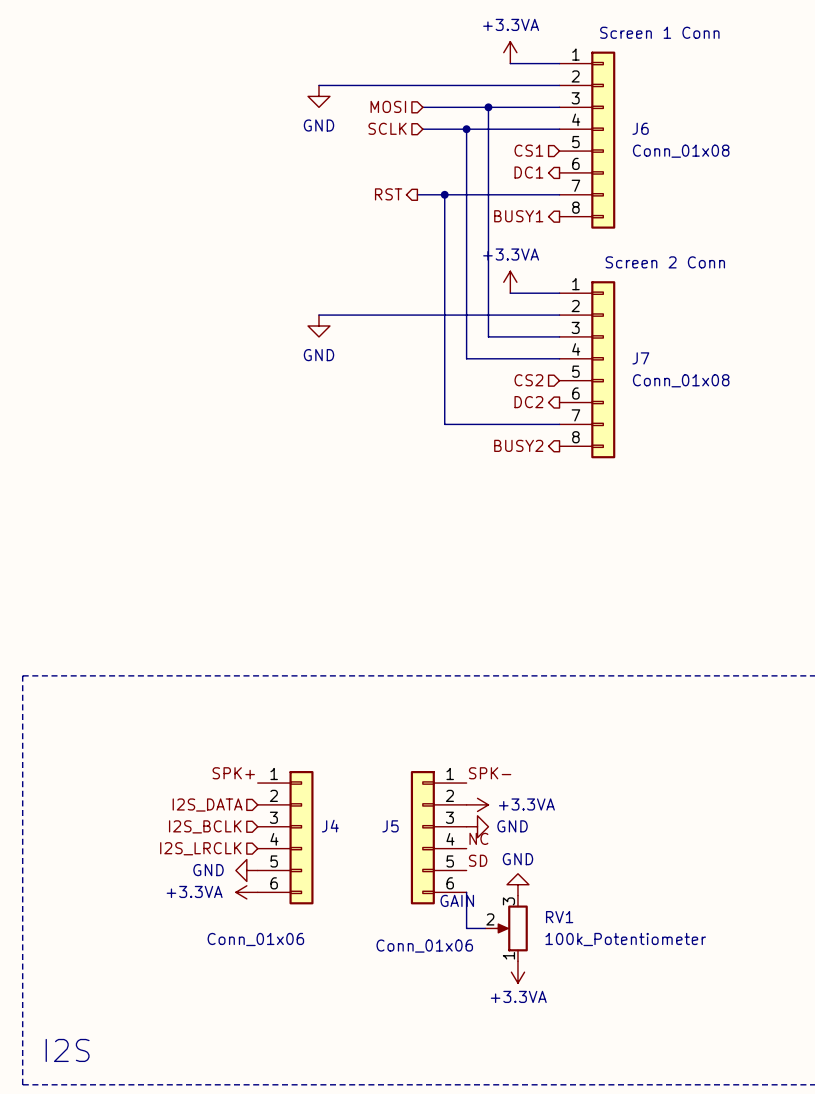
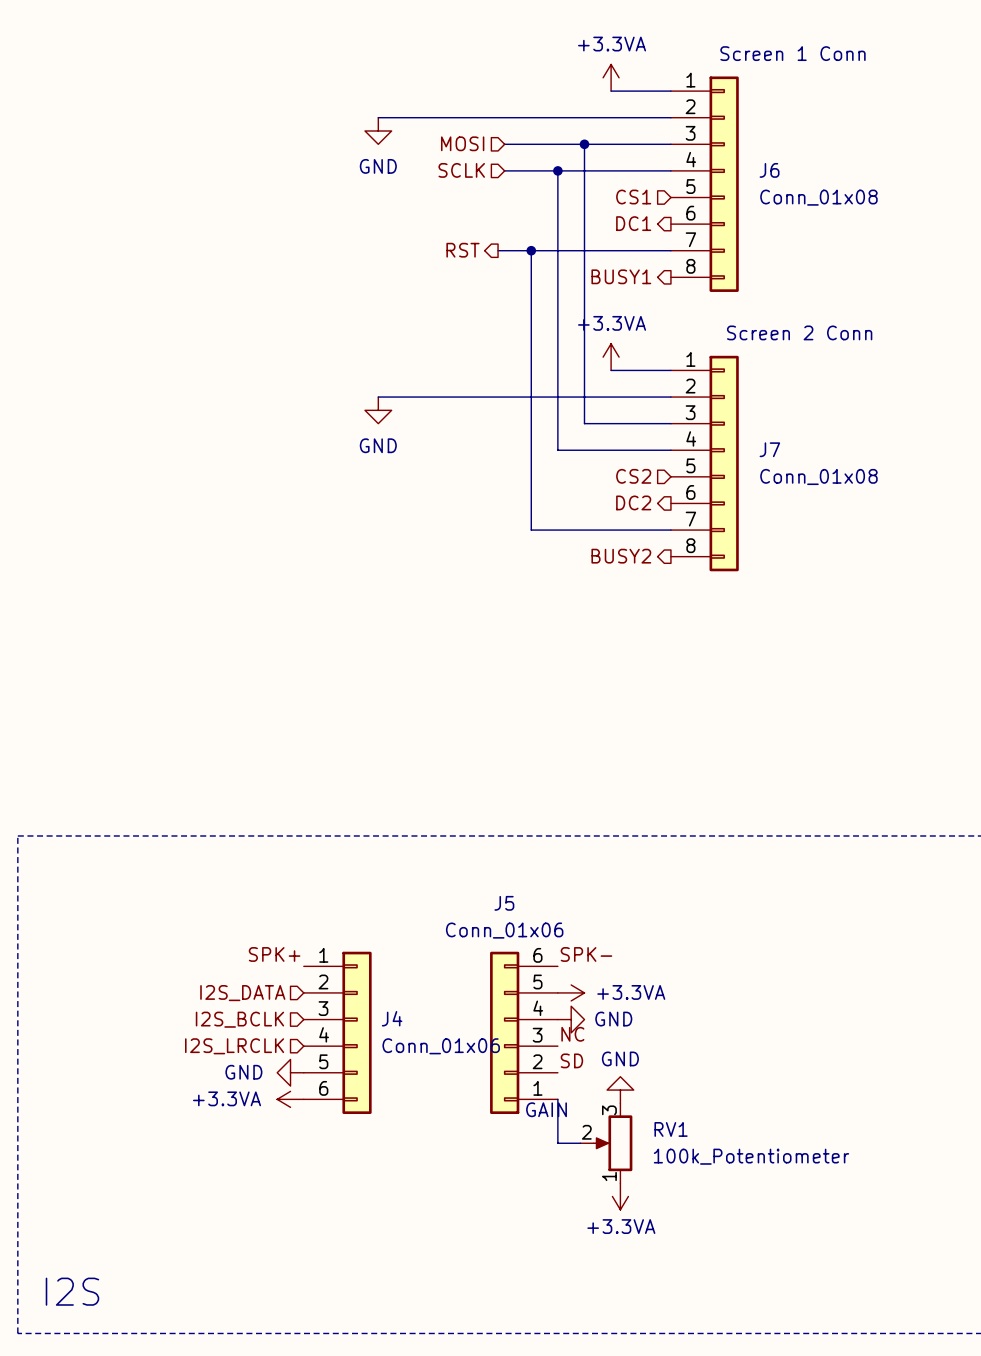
J5 name position: J5 (390, 826) -> J5 (504, 903)
J5 flip: as is (422, 837) -> up-down (504, 1032)
J4 value position: Conn_01x06 (255, 939) -> Conn_01x06 (441, 1046)
J5 value position: Conn_01x06 (424, 946) -> Conn_01x06 (504, 930)

